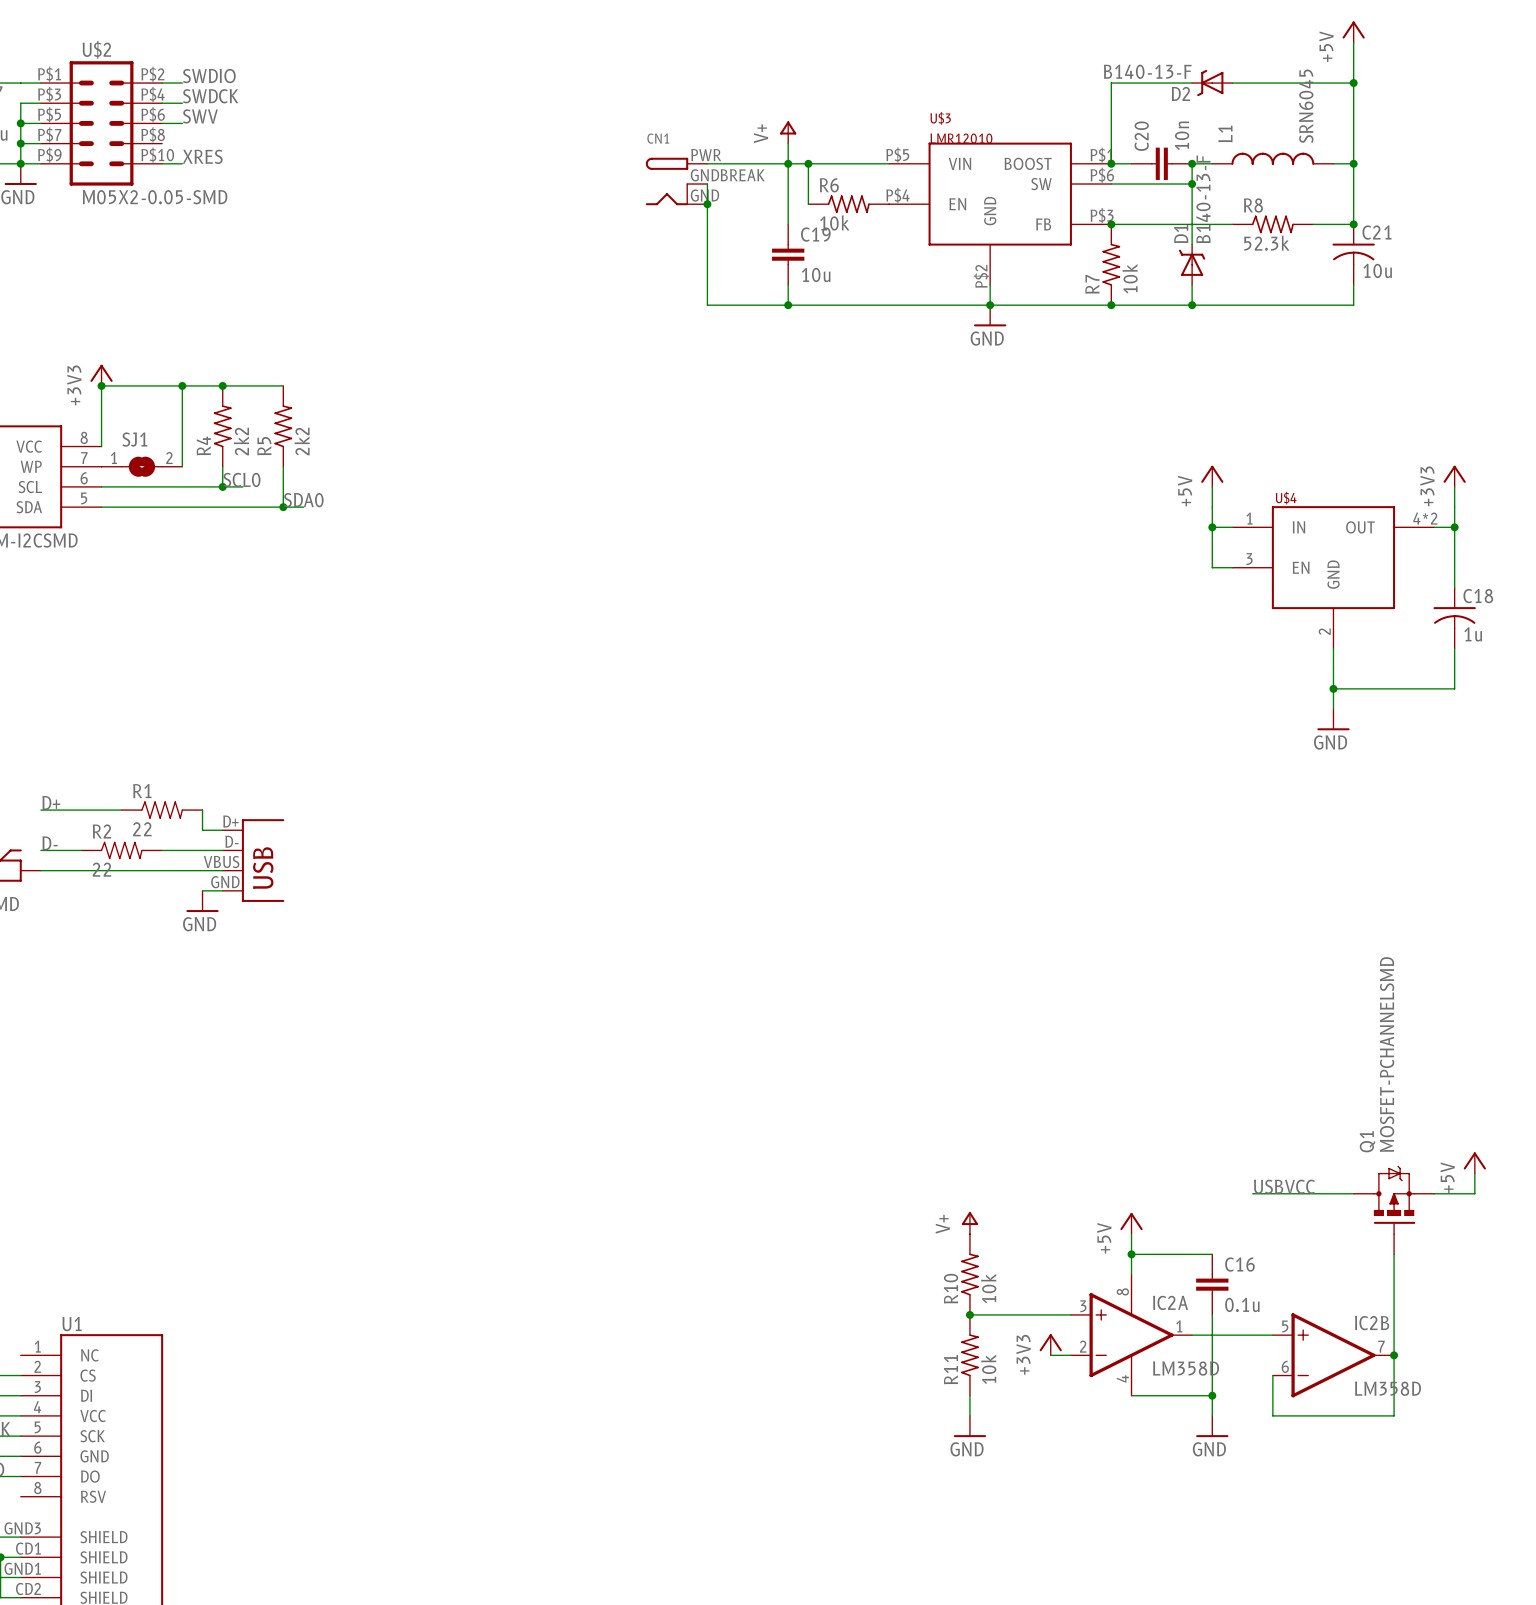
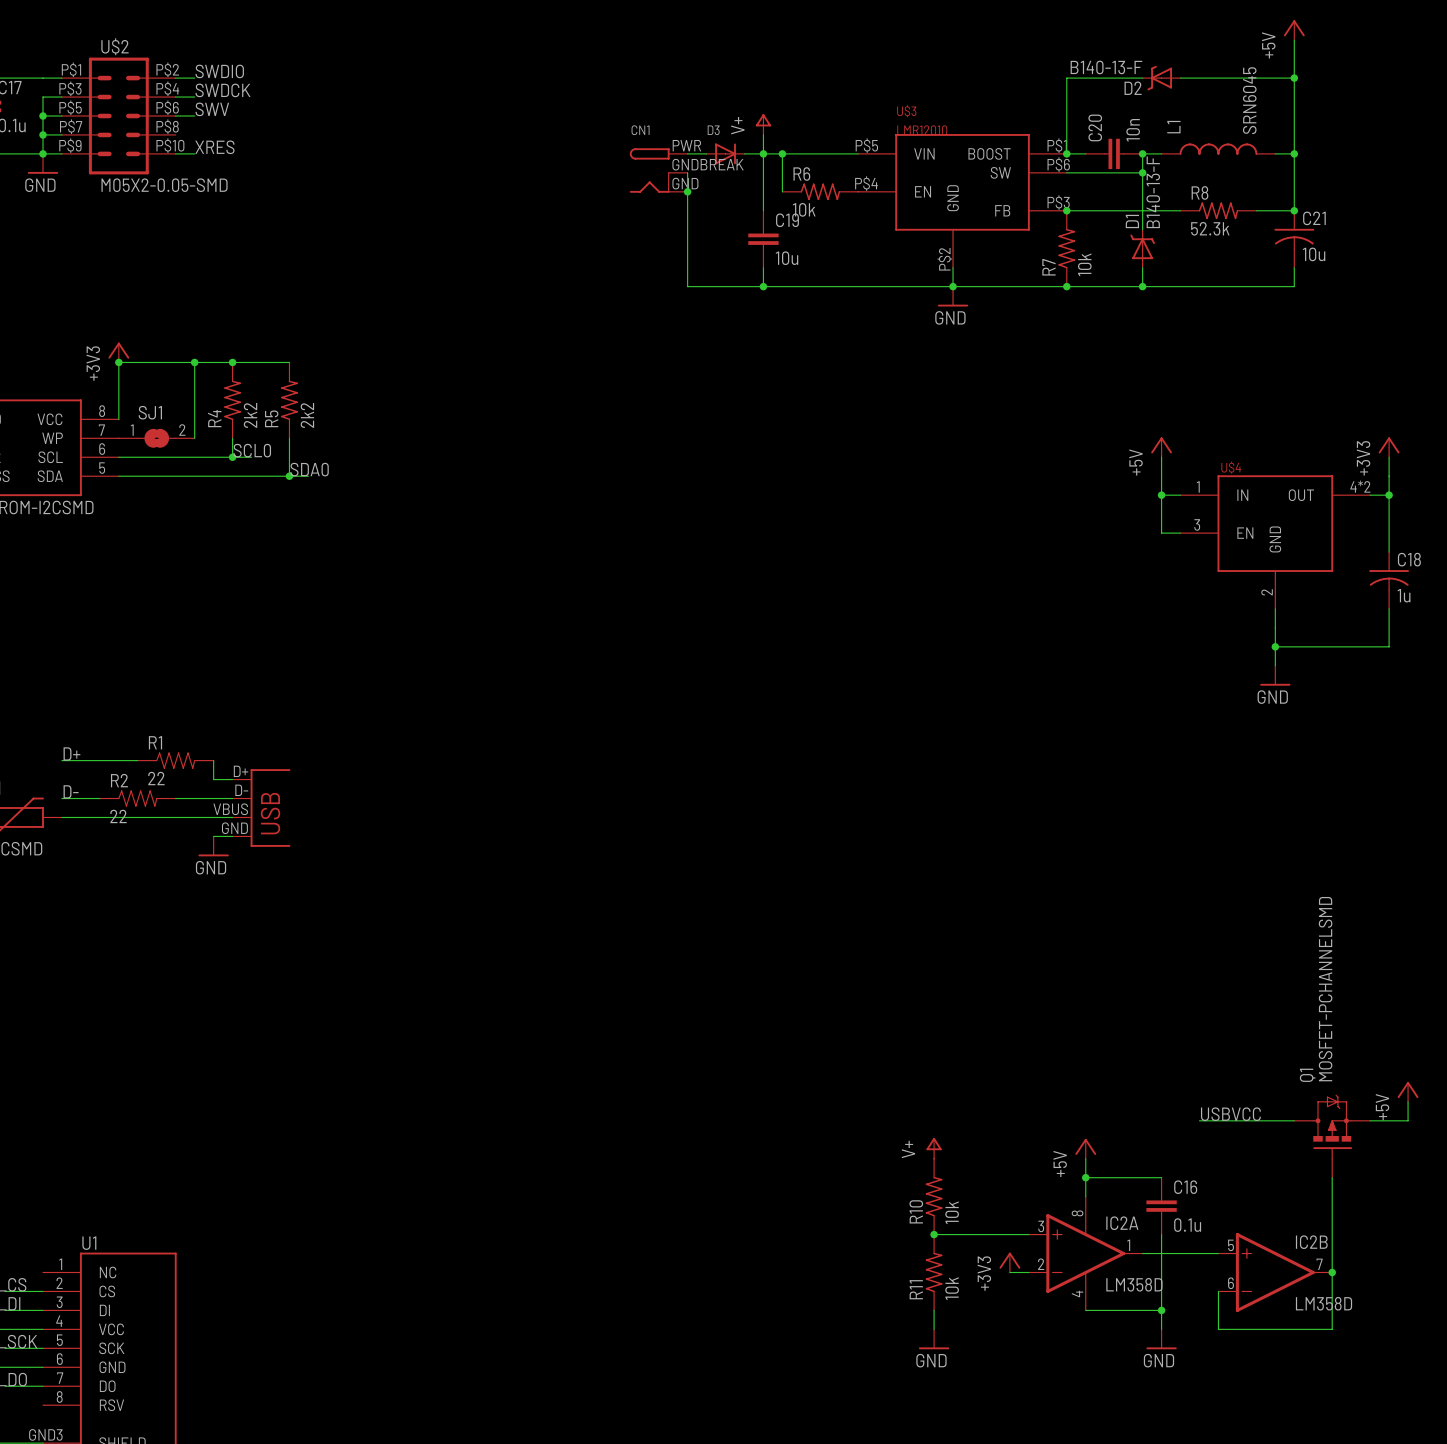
D3: none -> (725, 153)

